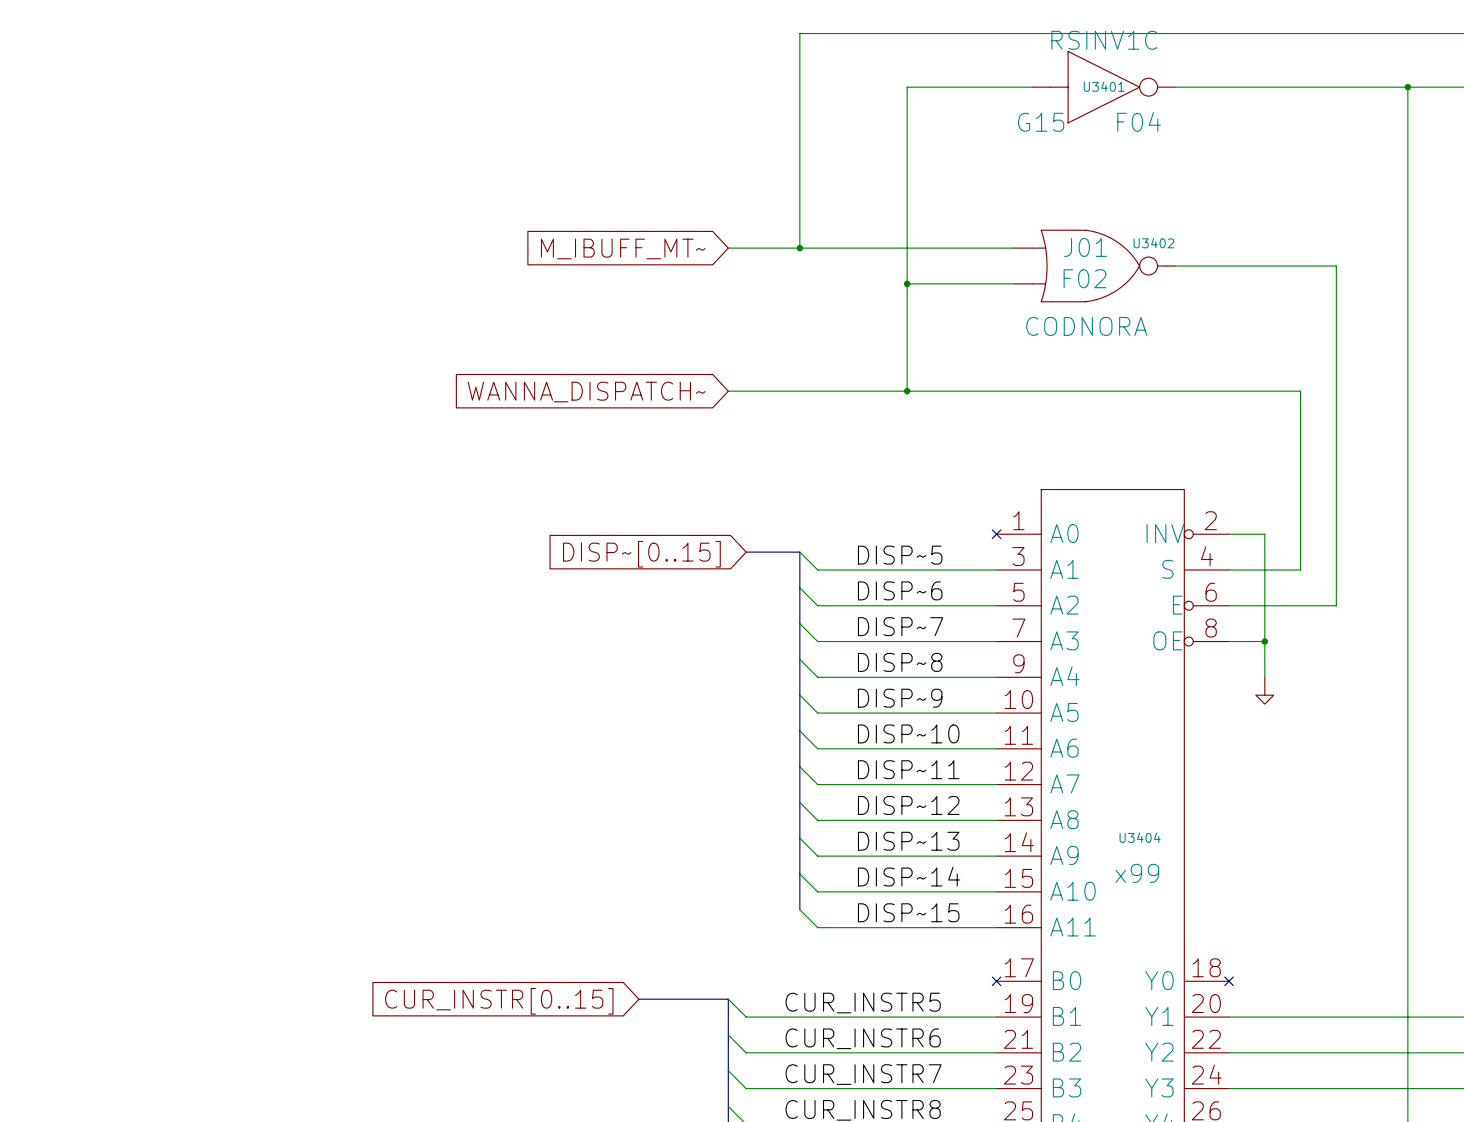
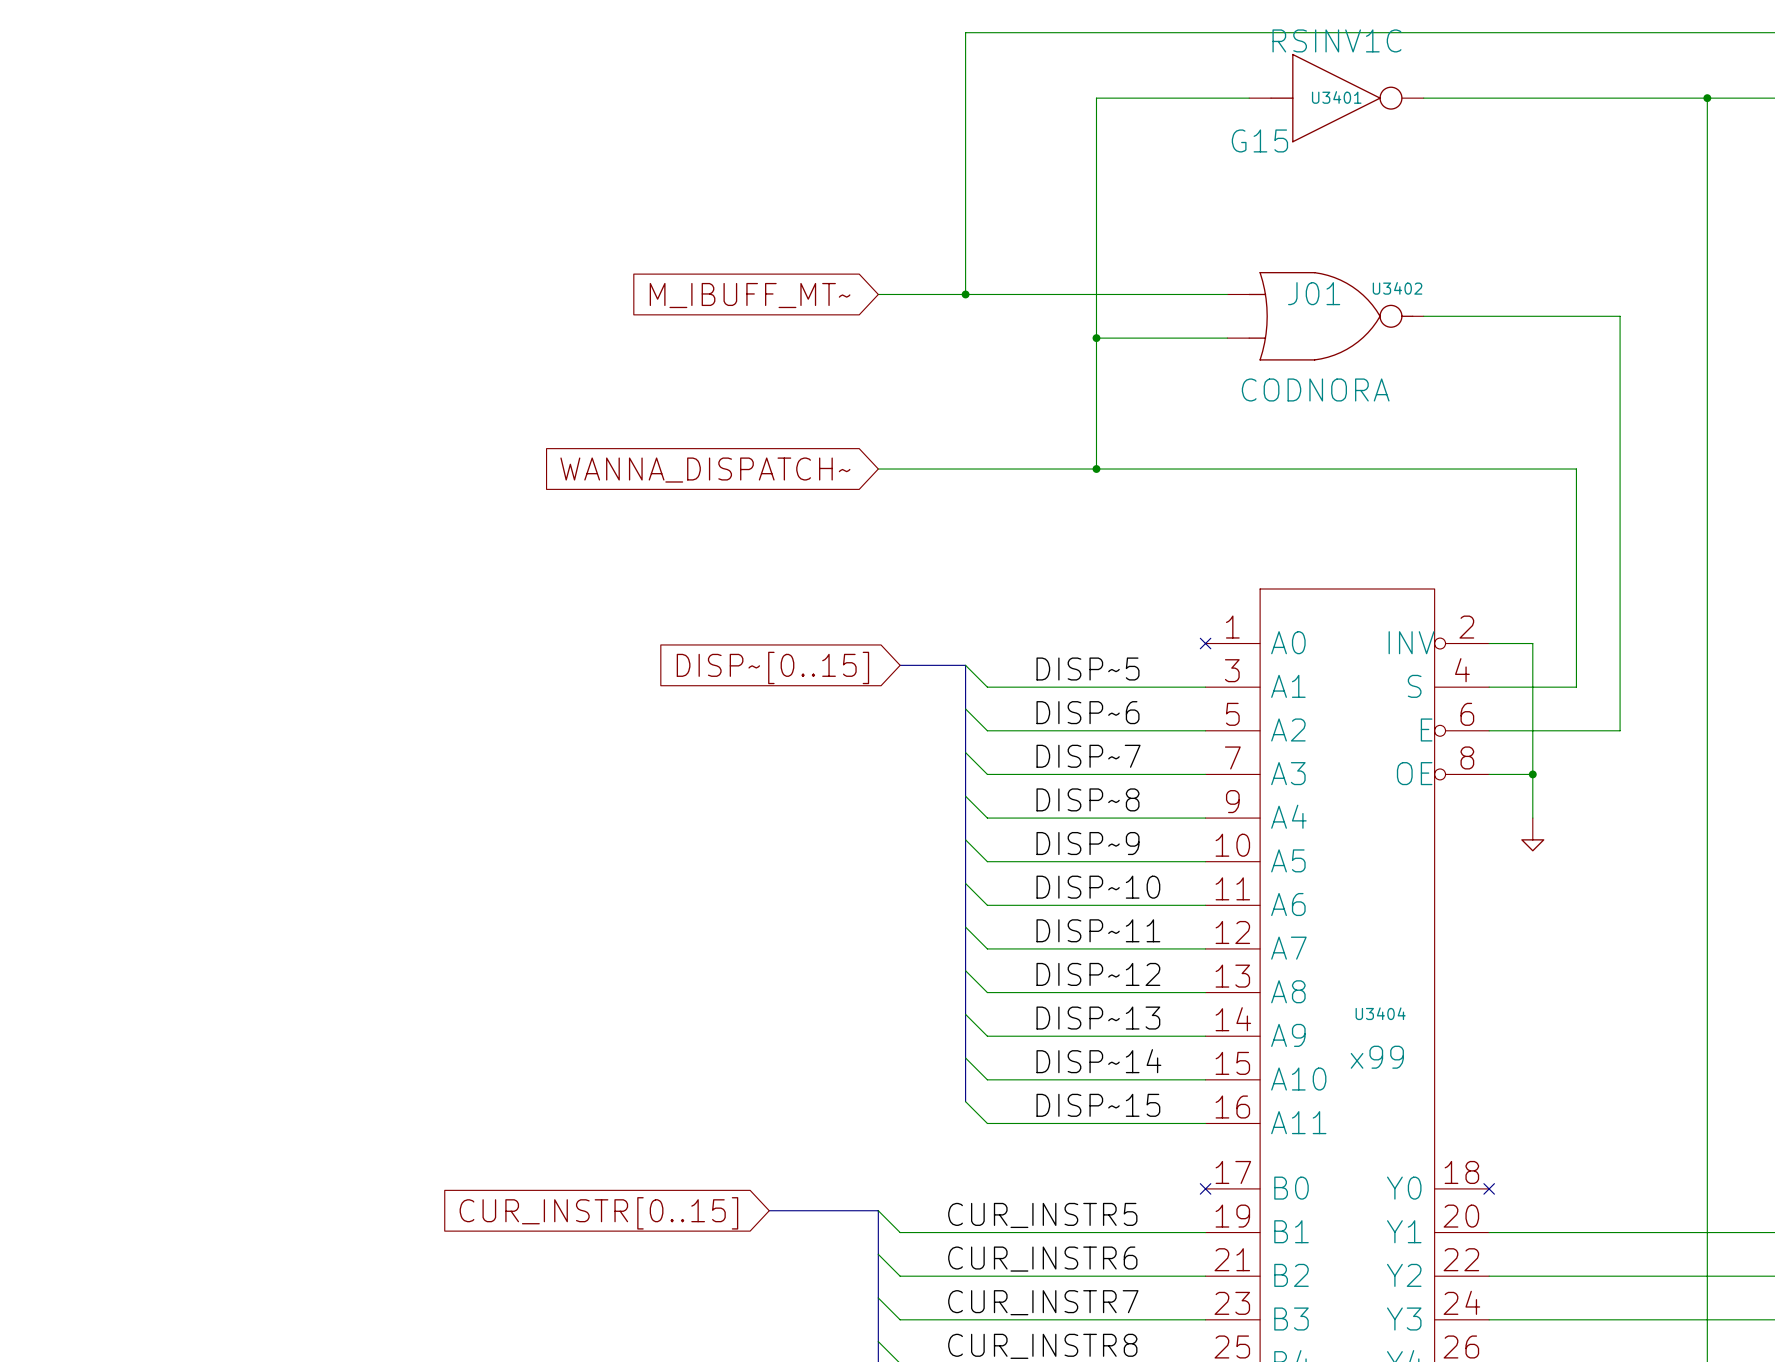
U3401 value: F04 (1139, 121) -> none
U3402 value: F02 (1084, 278) -> none

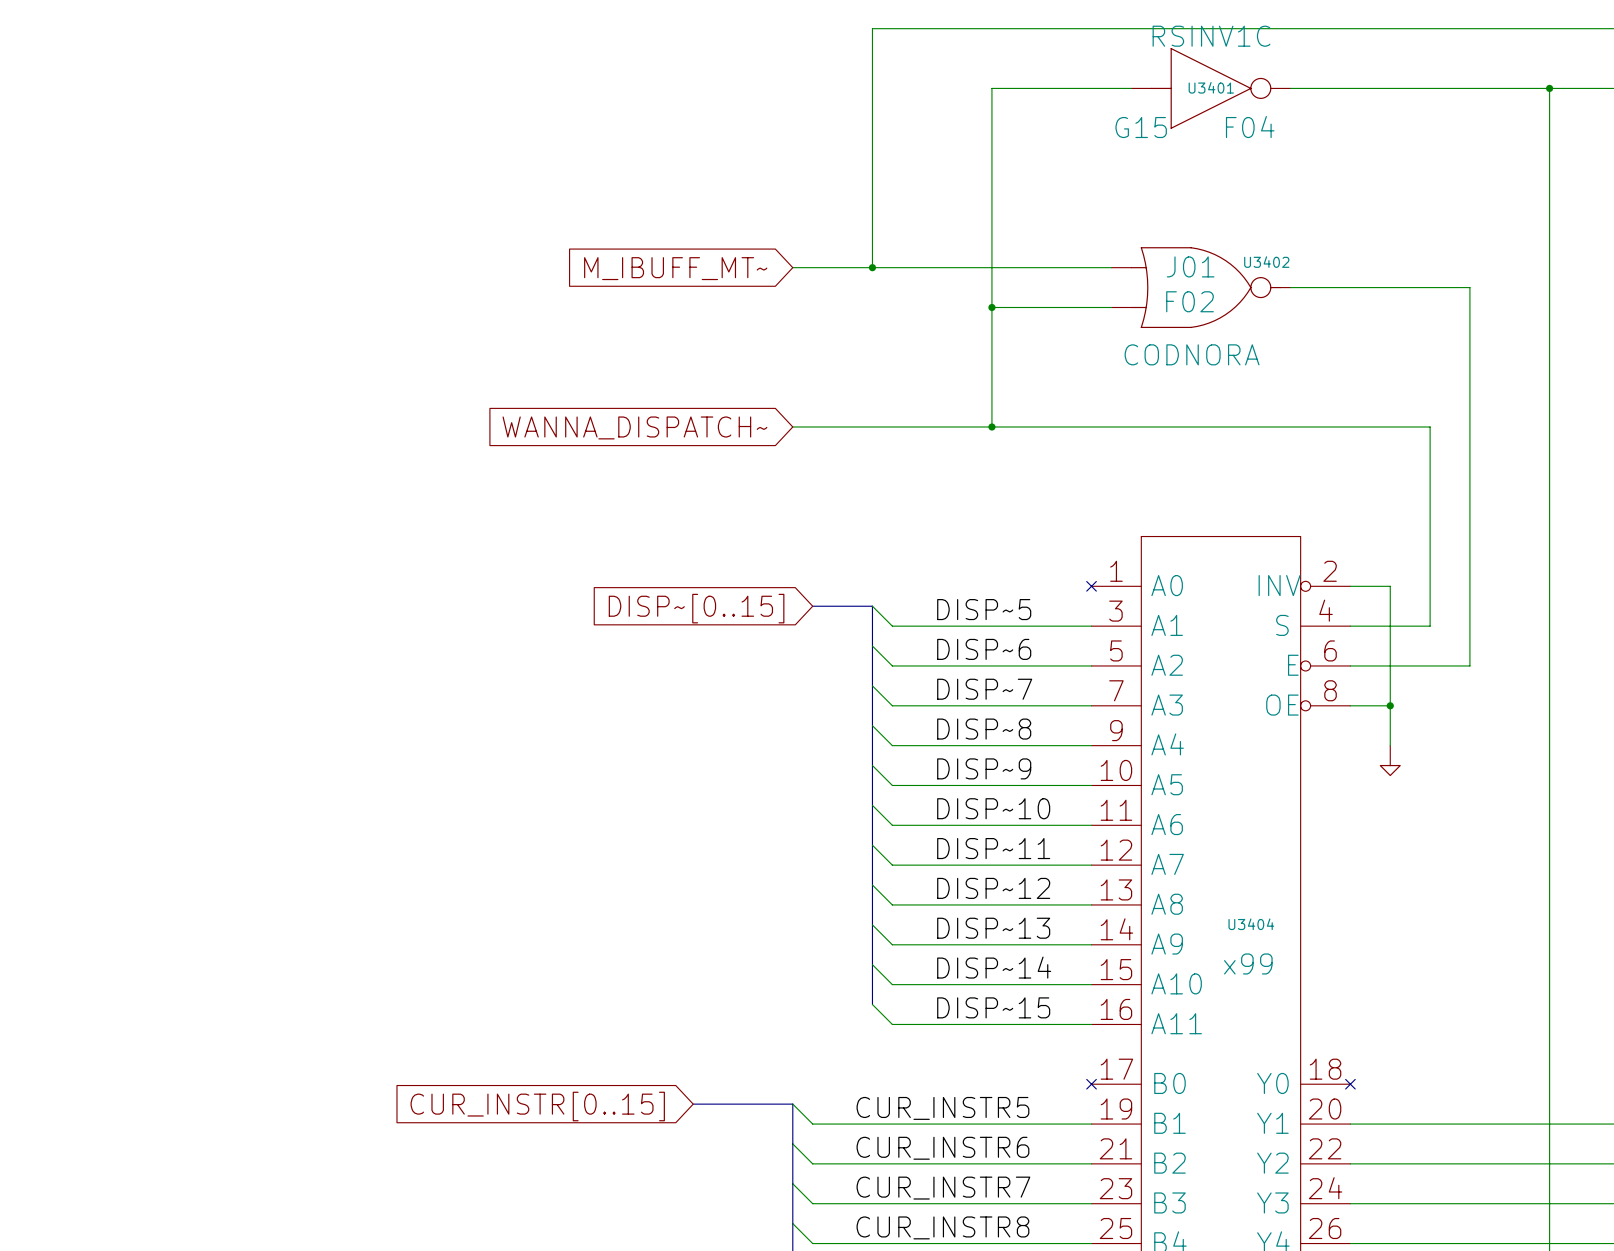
U3401 value: none -> F04 (1250, 127)
U3402 value: none -> F02 (1190, 301)

